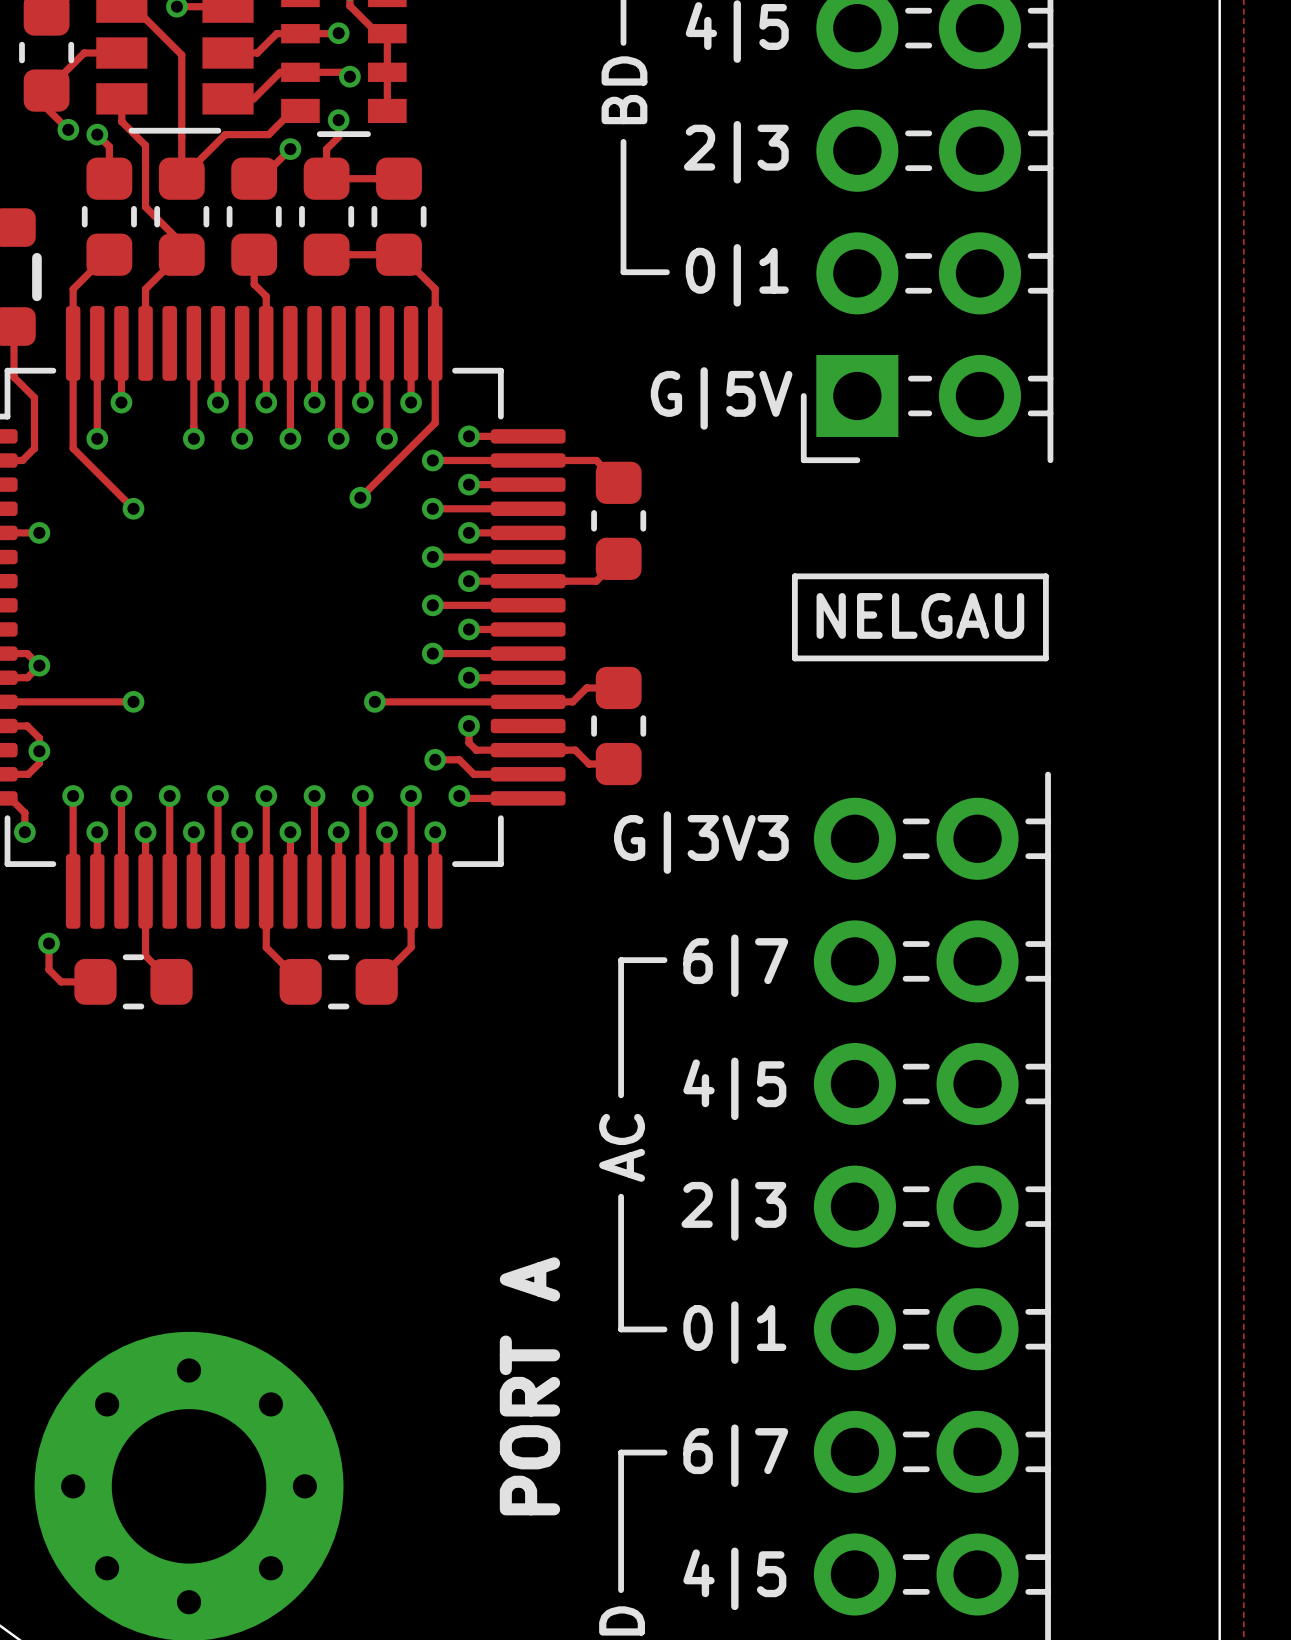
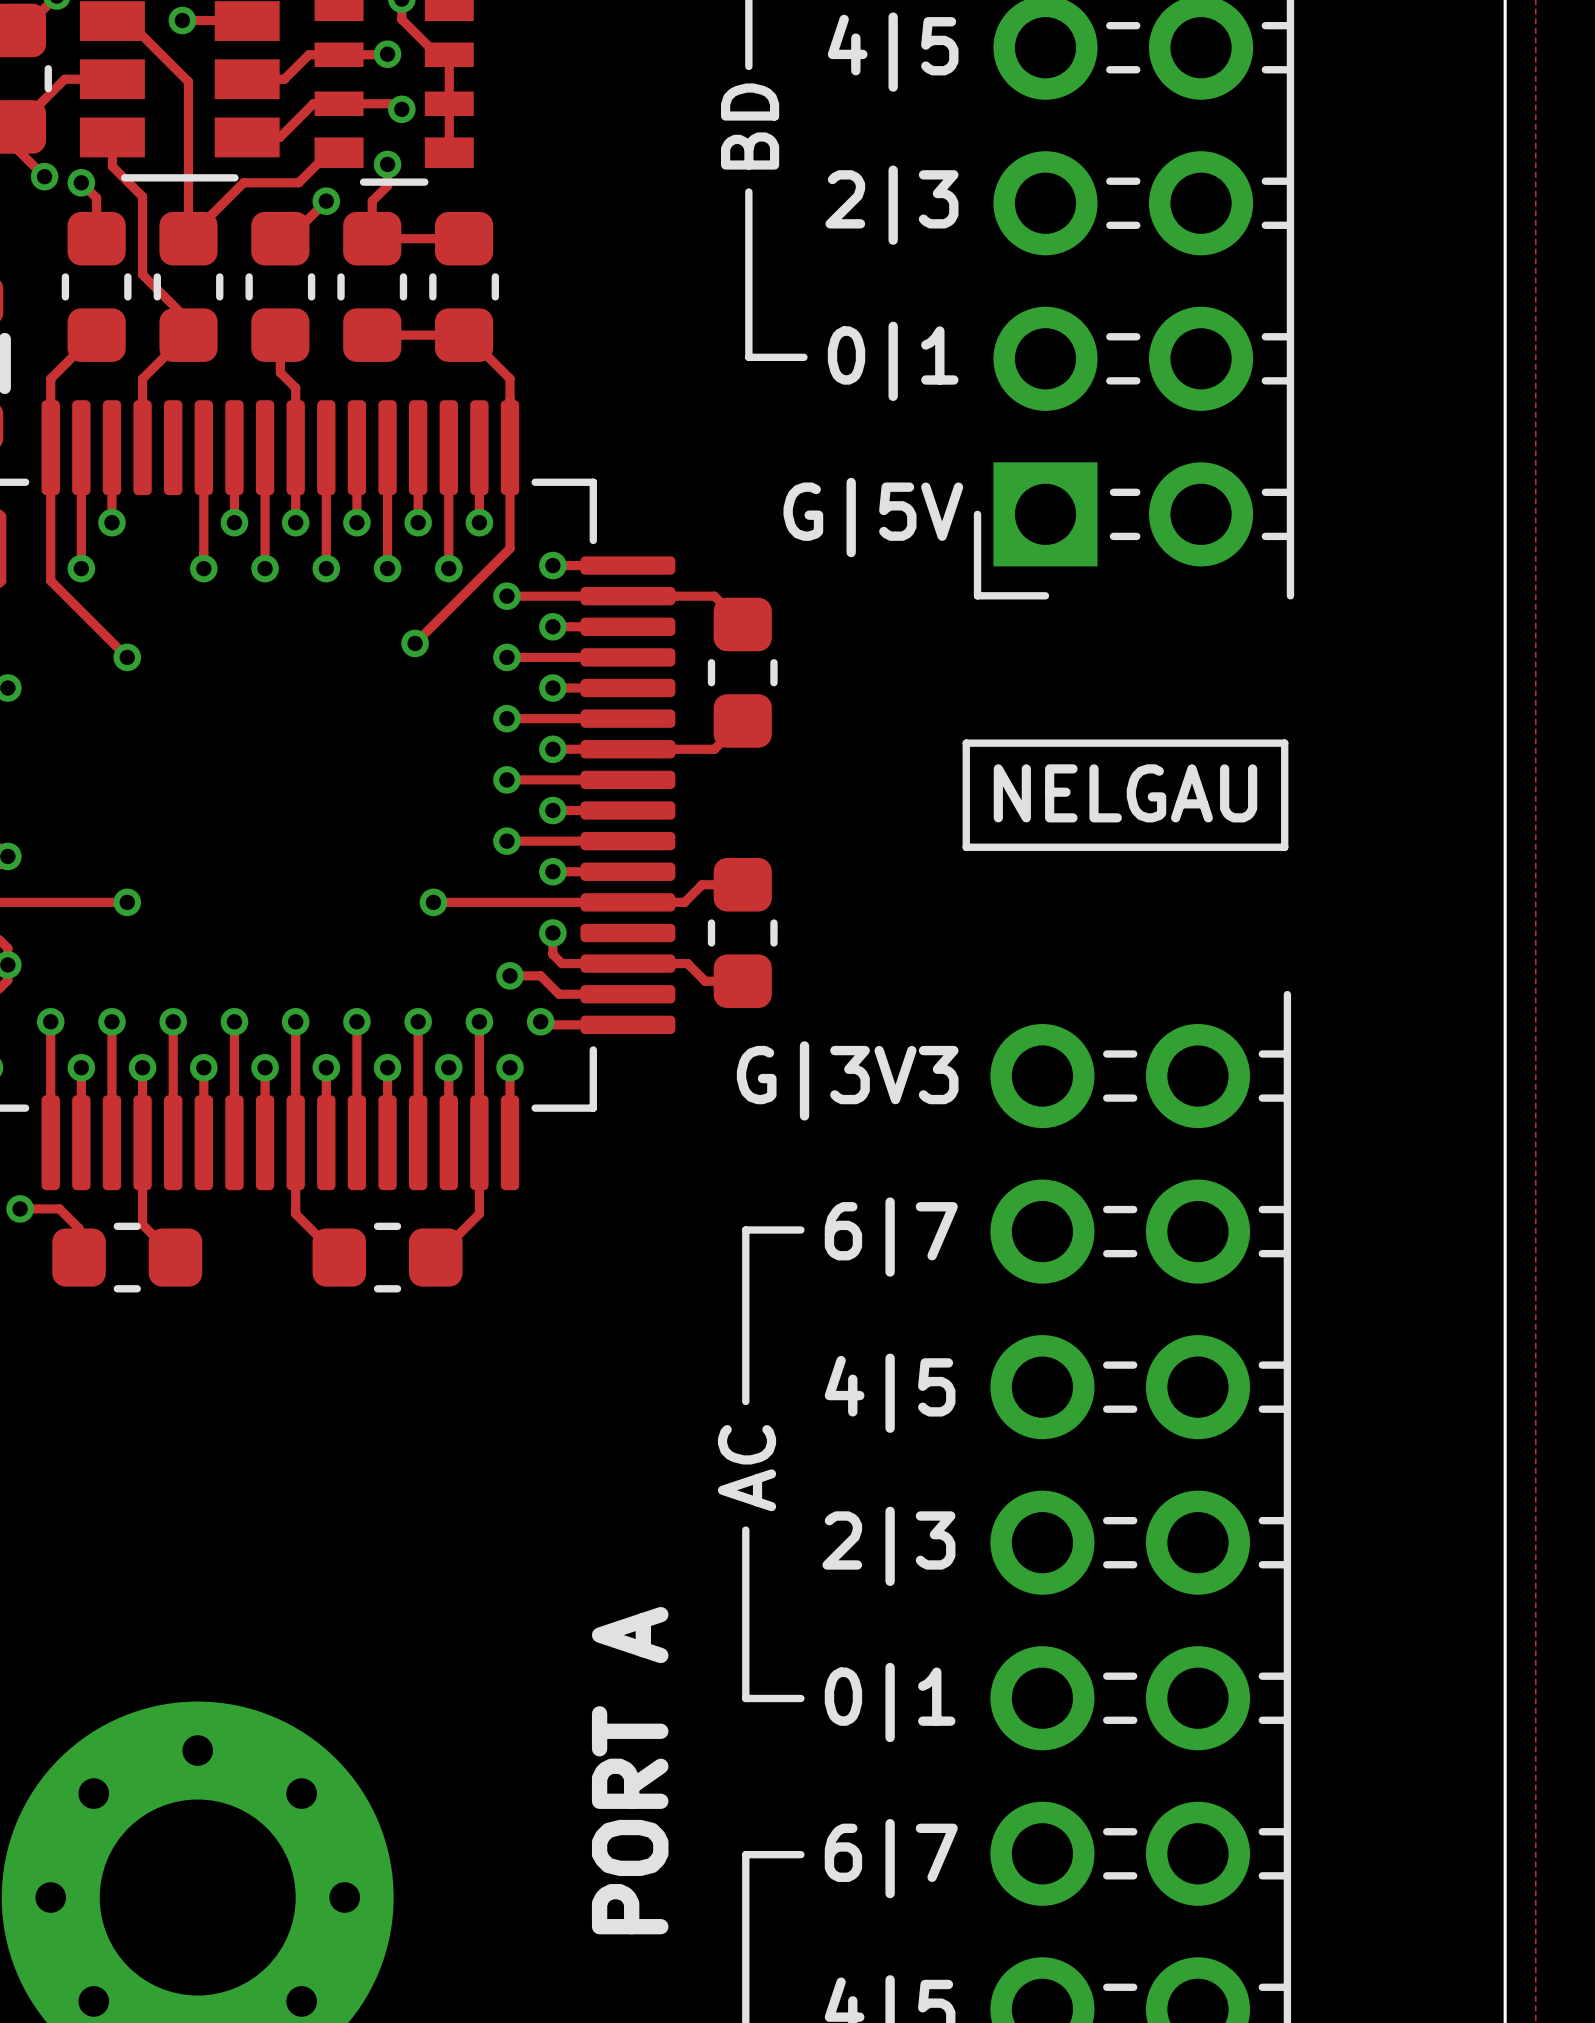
track: (49, 943) (49, 969) (61, 981) (95, 981) -> (20, 1208) (59, 1208) (79, 1228) (79, 1257)

